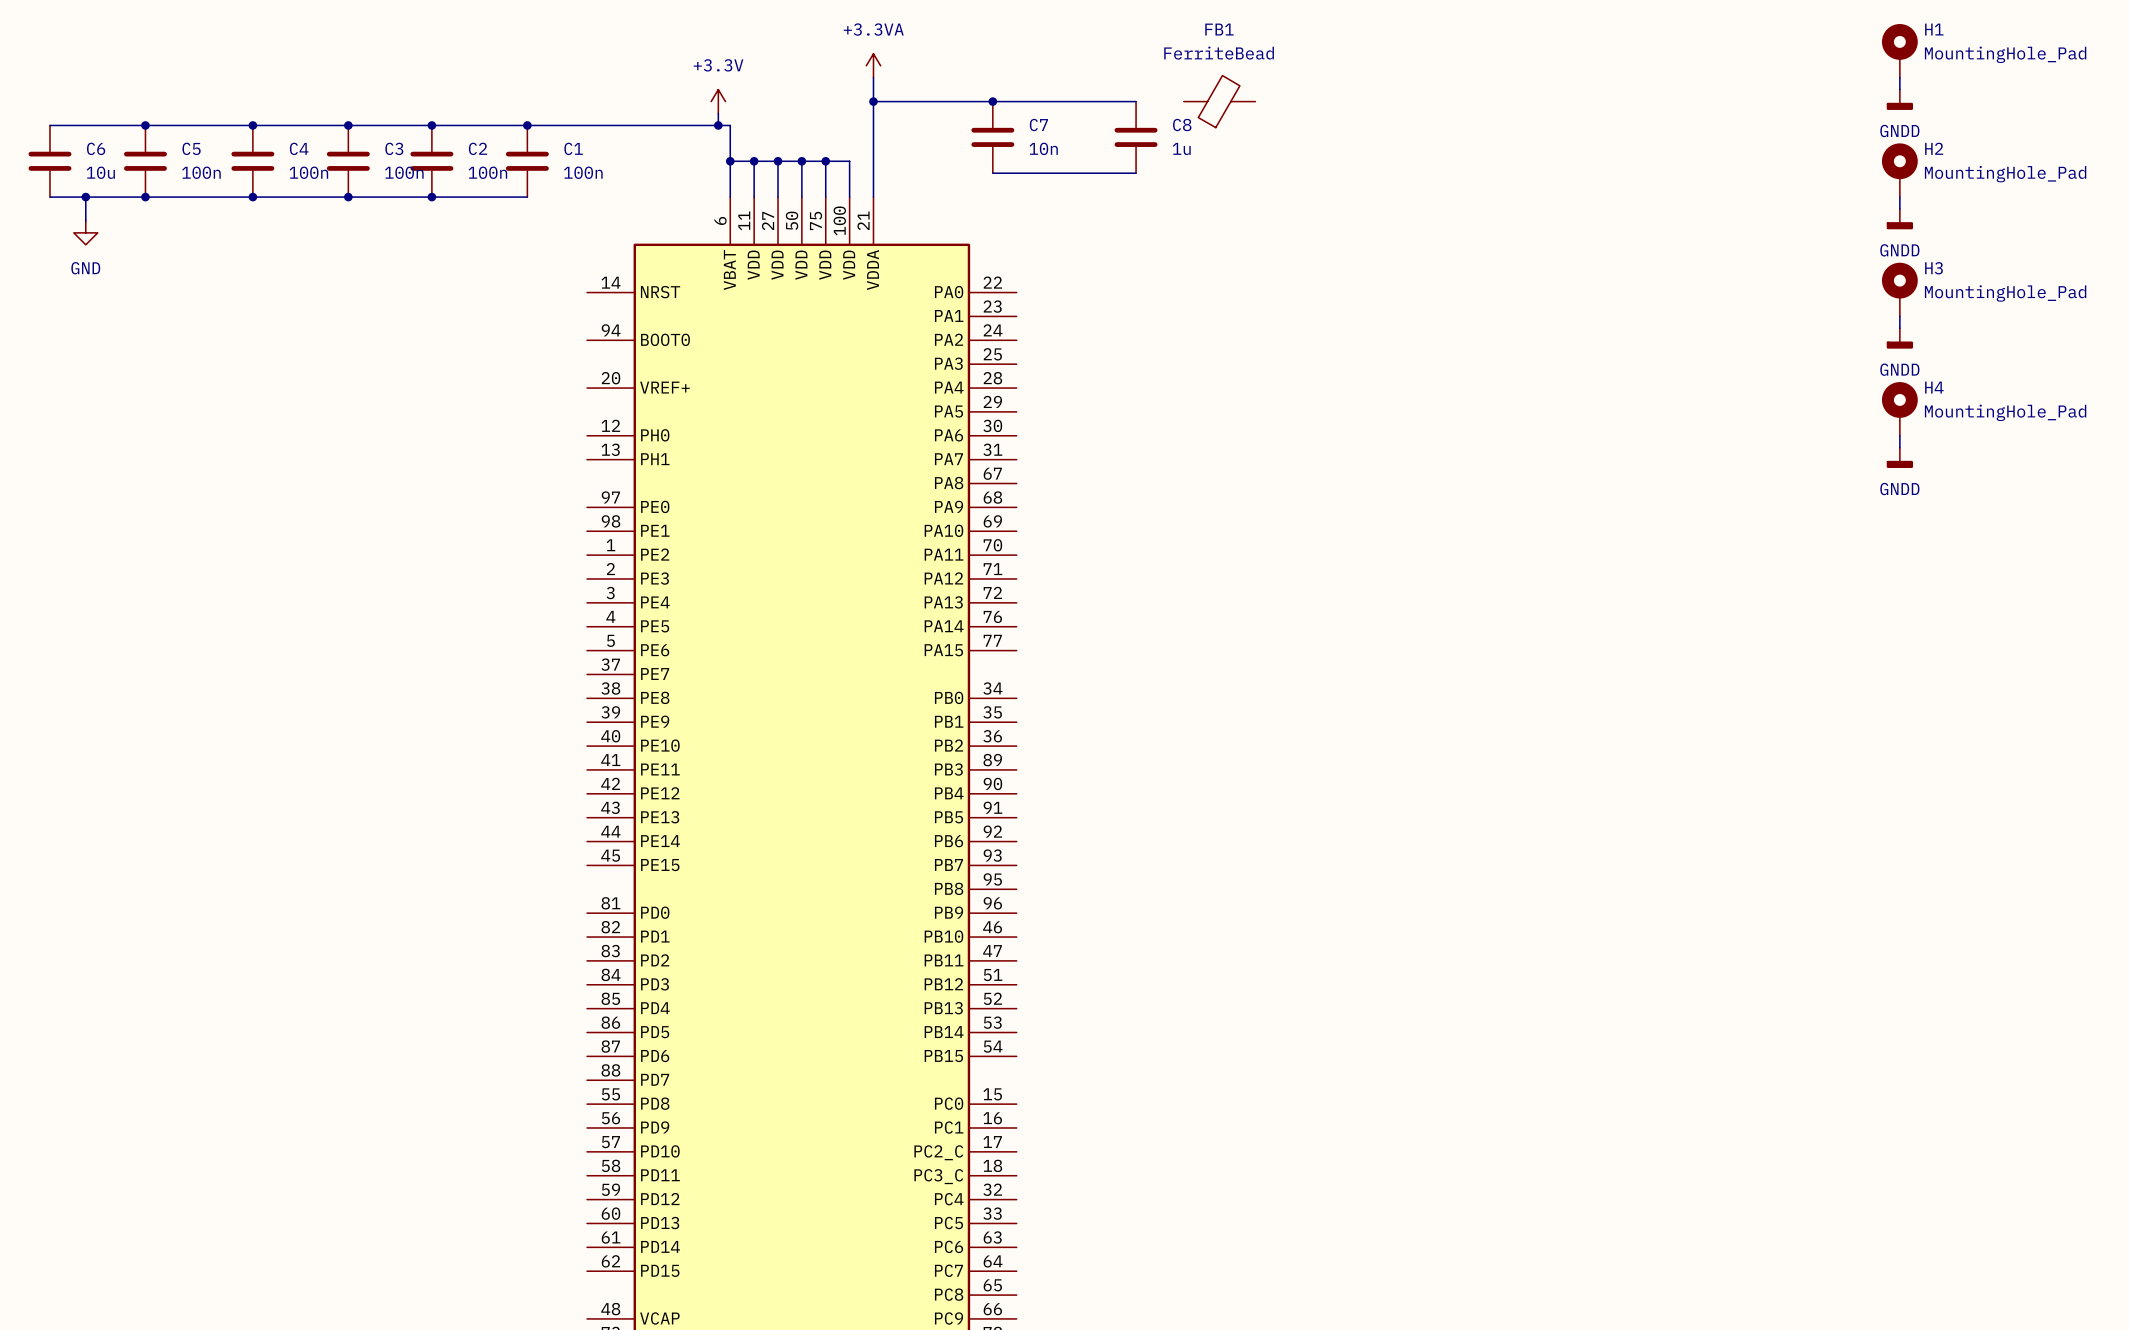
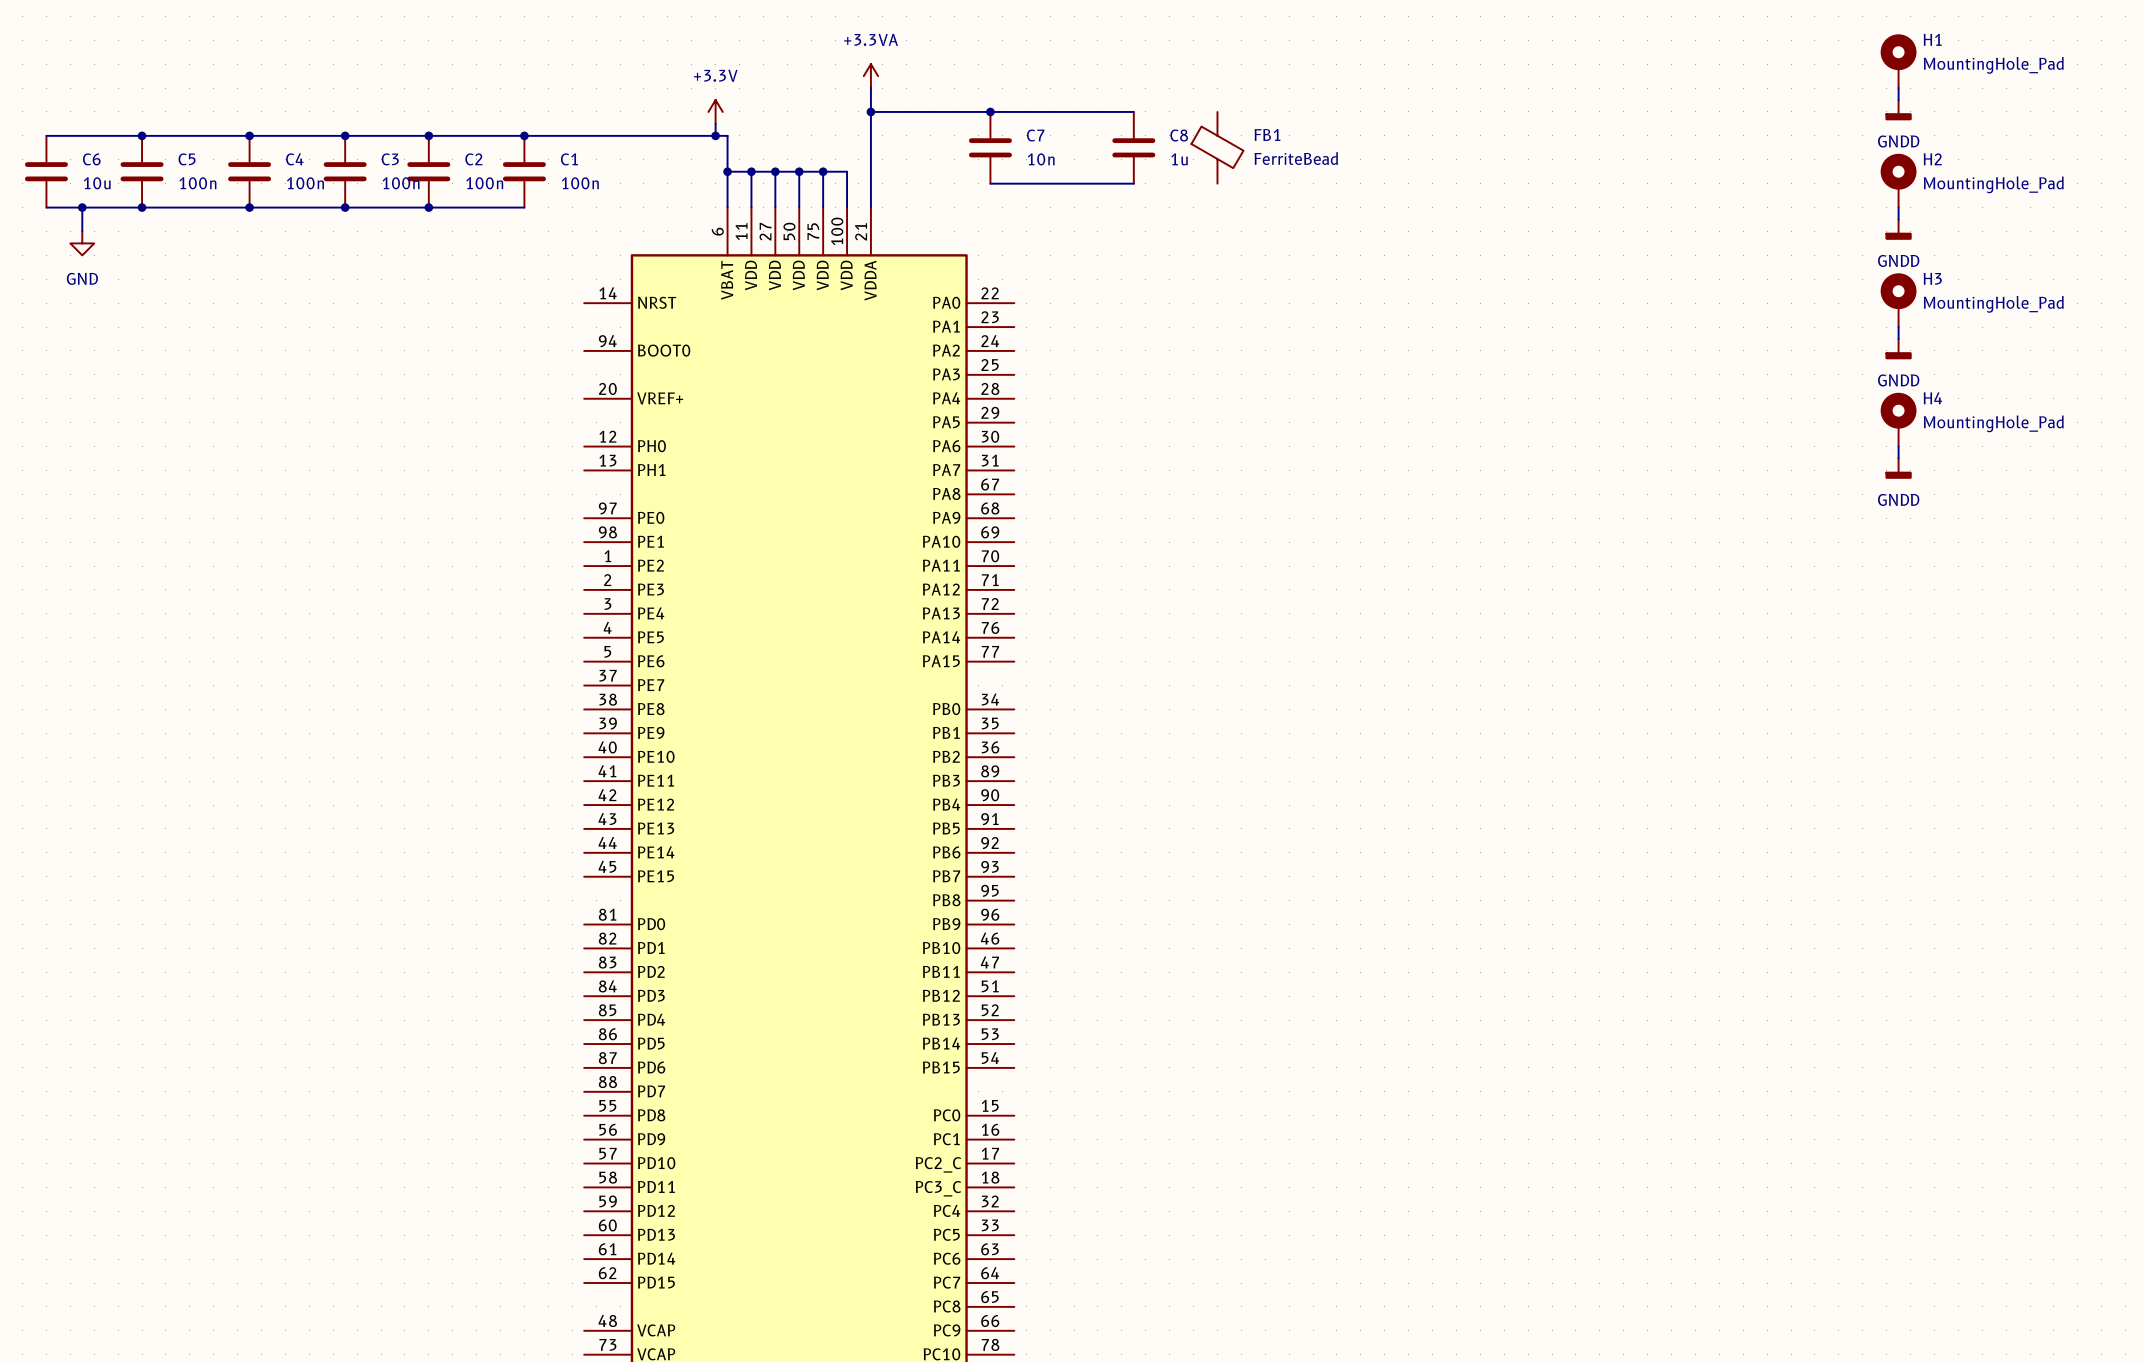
FB1 name position: FB1 (1219, 29) -> FB1 (1267, 134)
FB1 value position: FerriteBead (1219, 53) -> FerriteBead (1296, 158)
FB1 rotation: 0° (1219, 101) -> 90° clockwise (1217, 147)

